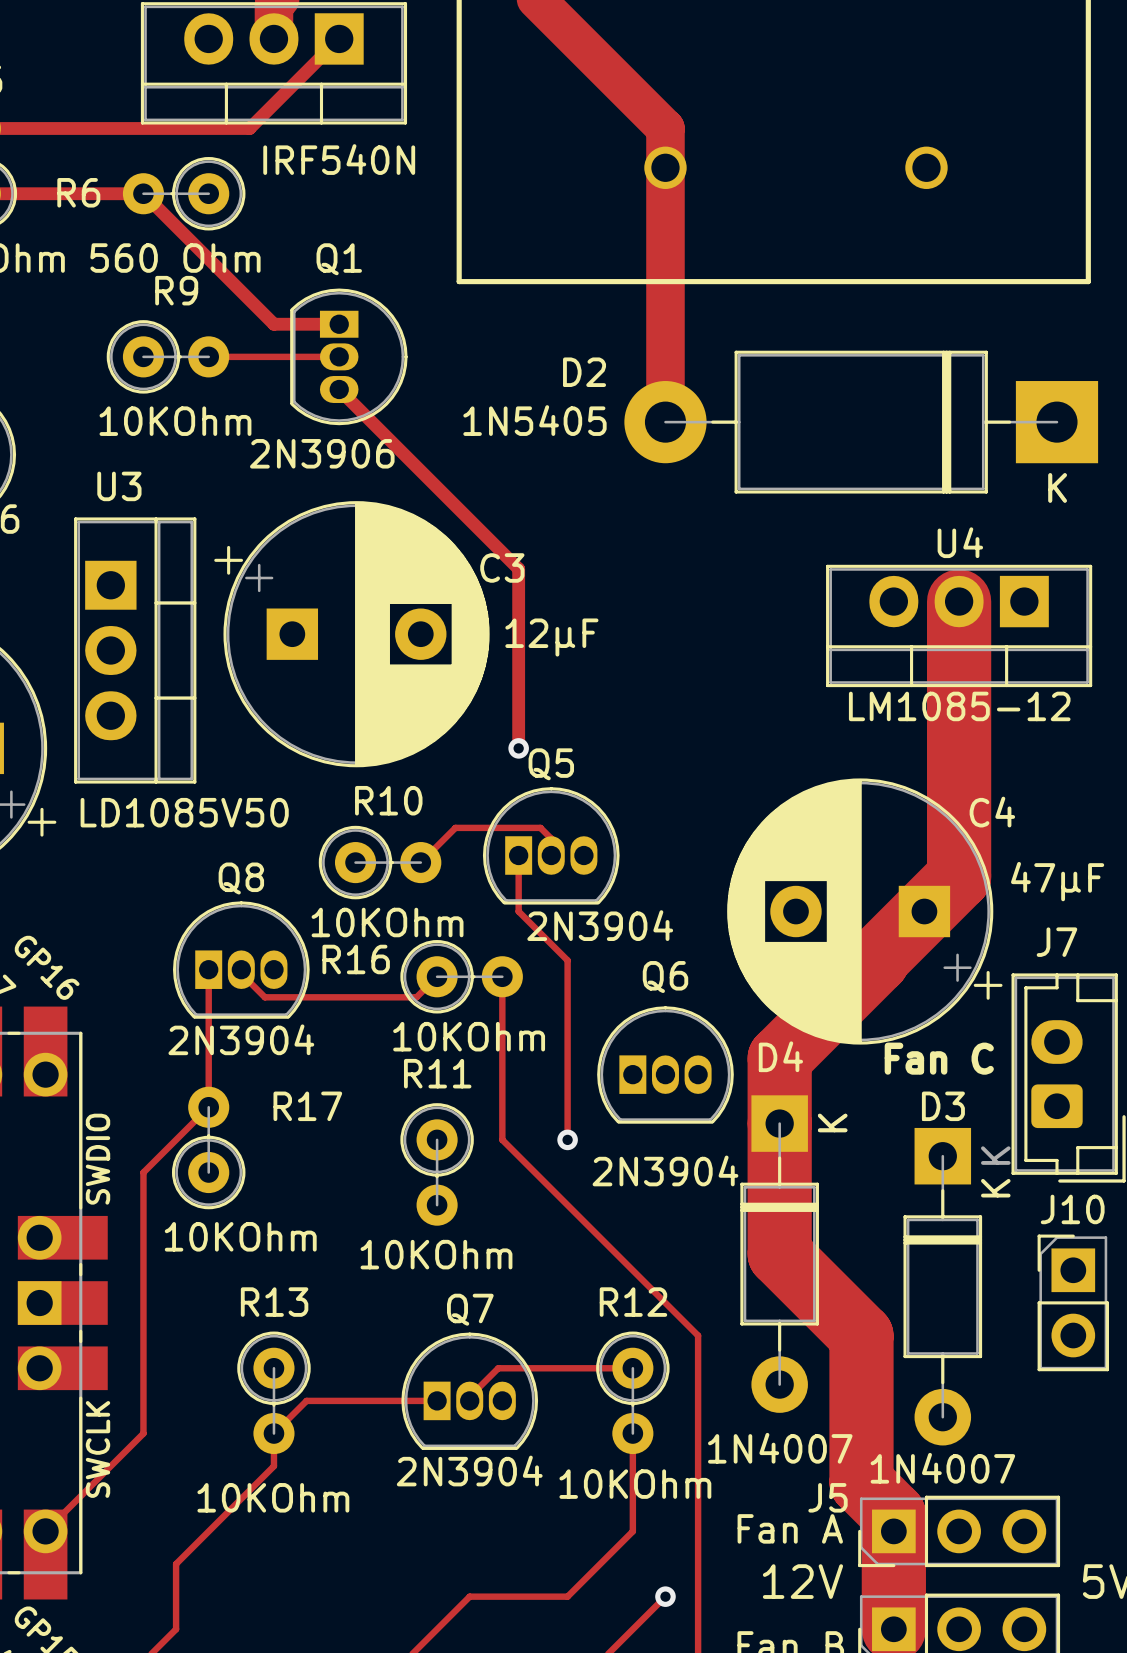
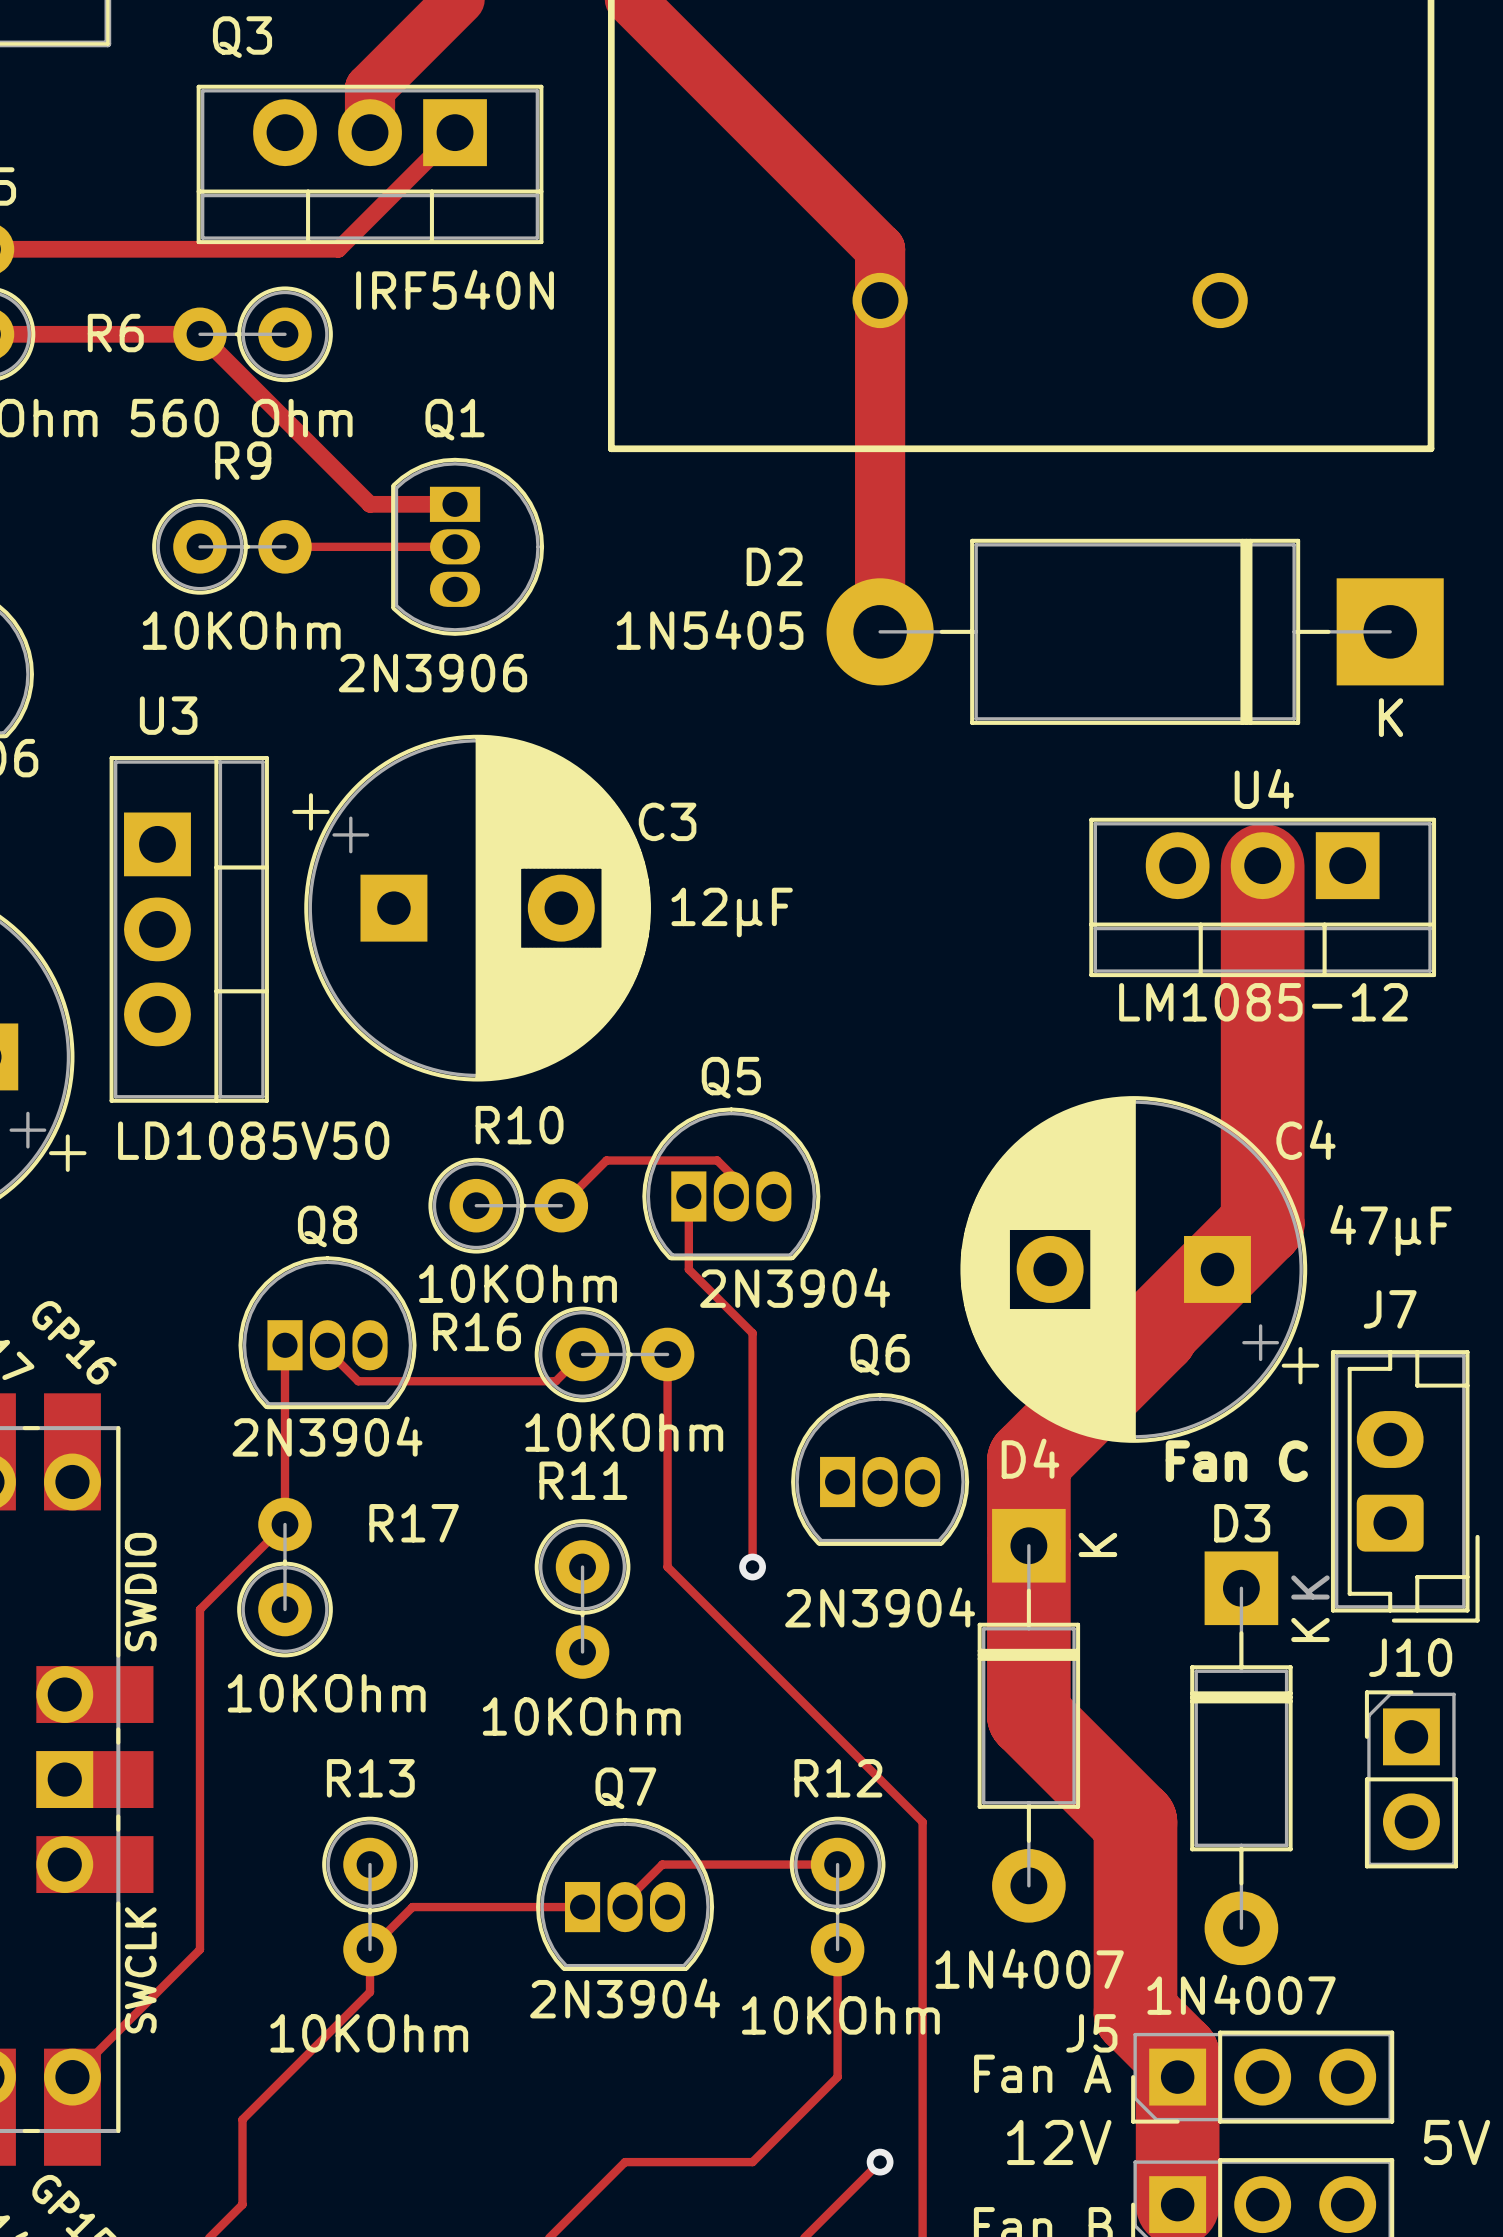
track: (339, 389) (518, 568) (518, 748) -> none
via: (518, 748) -> none

